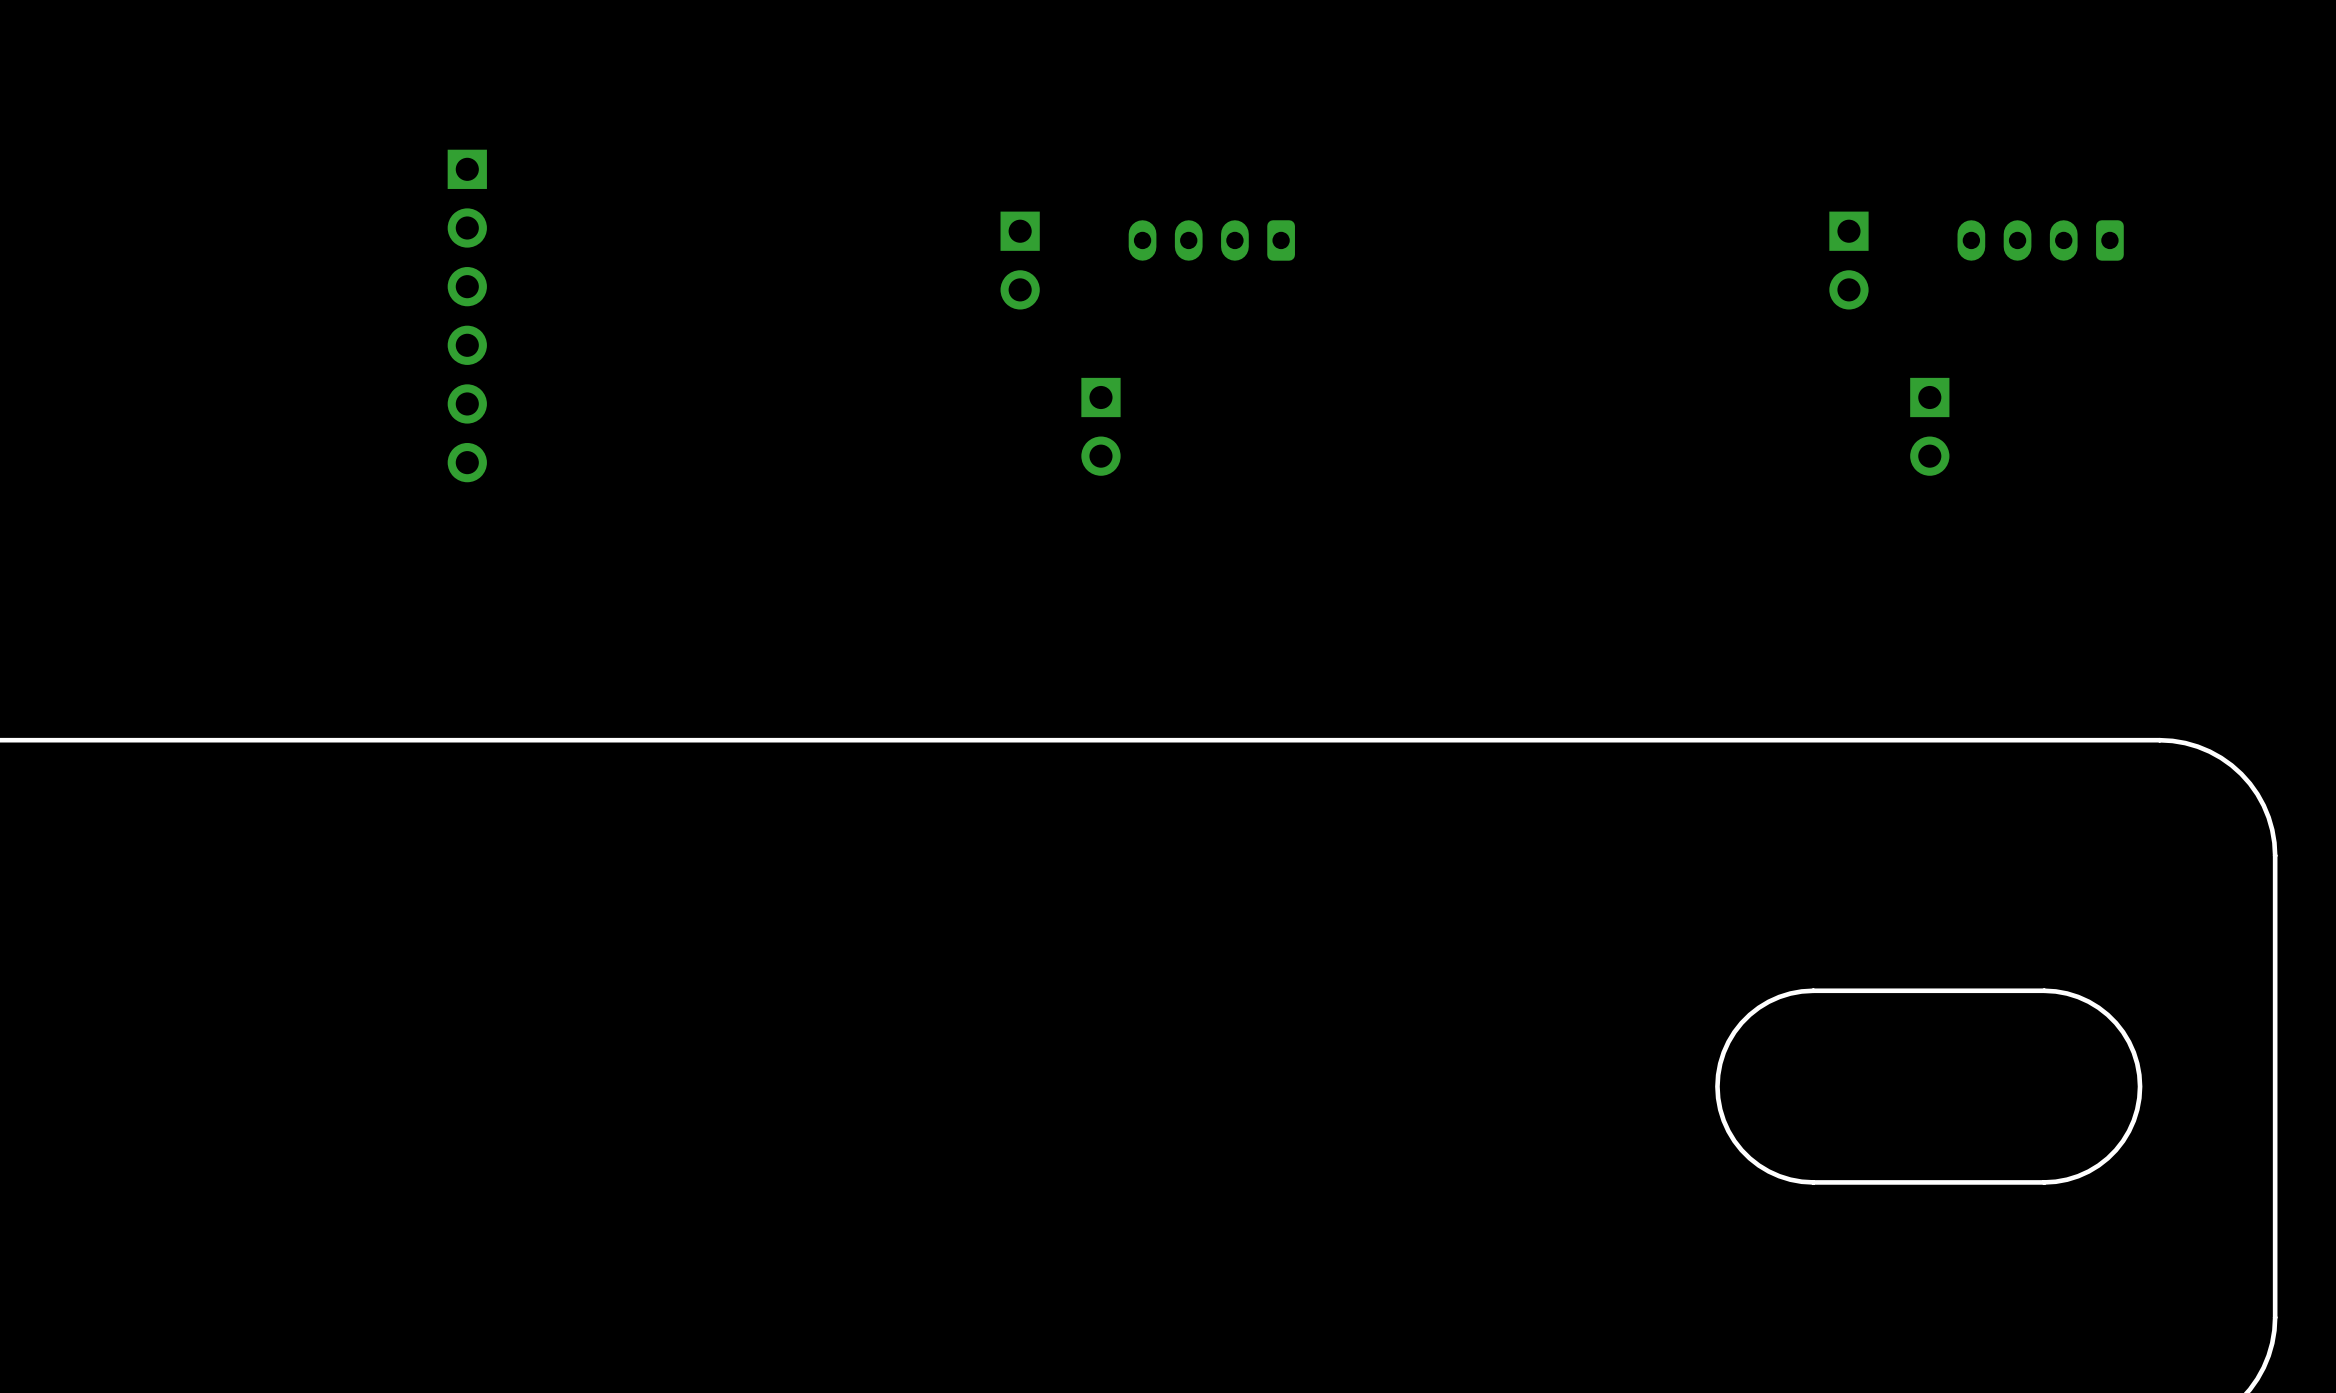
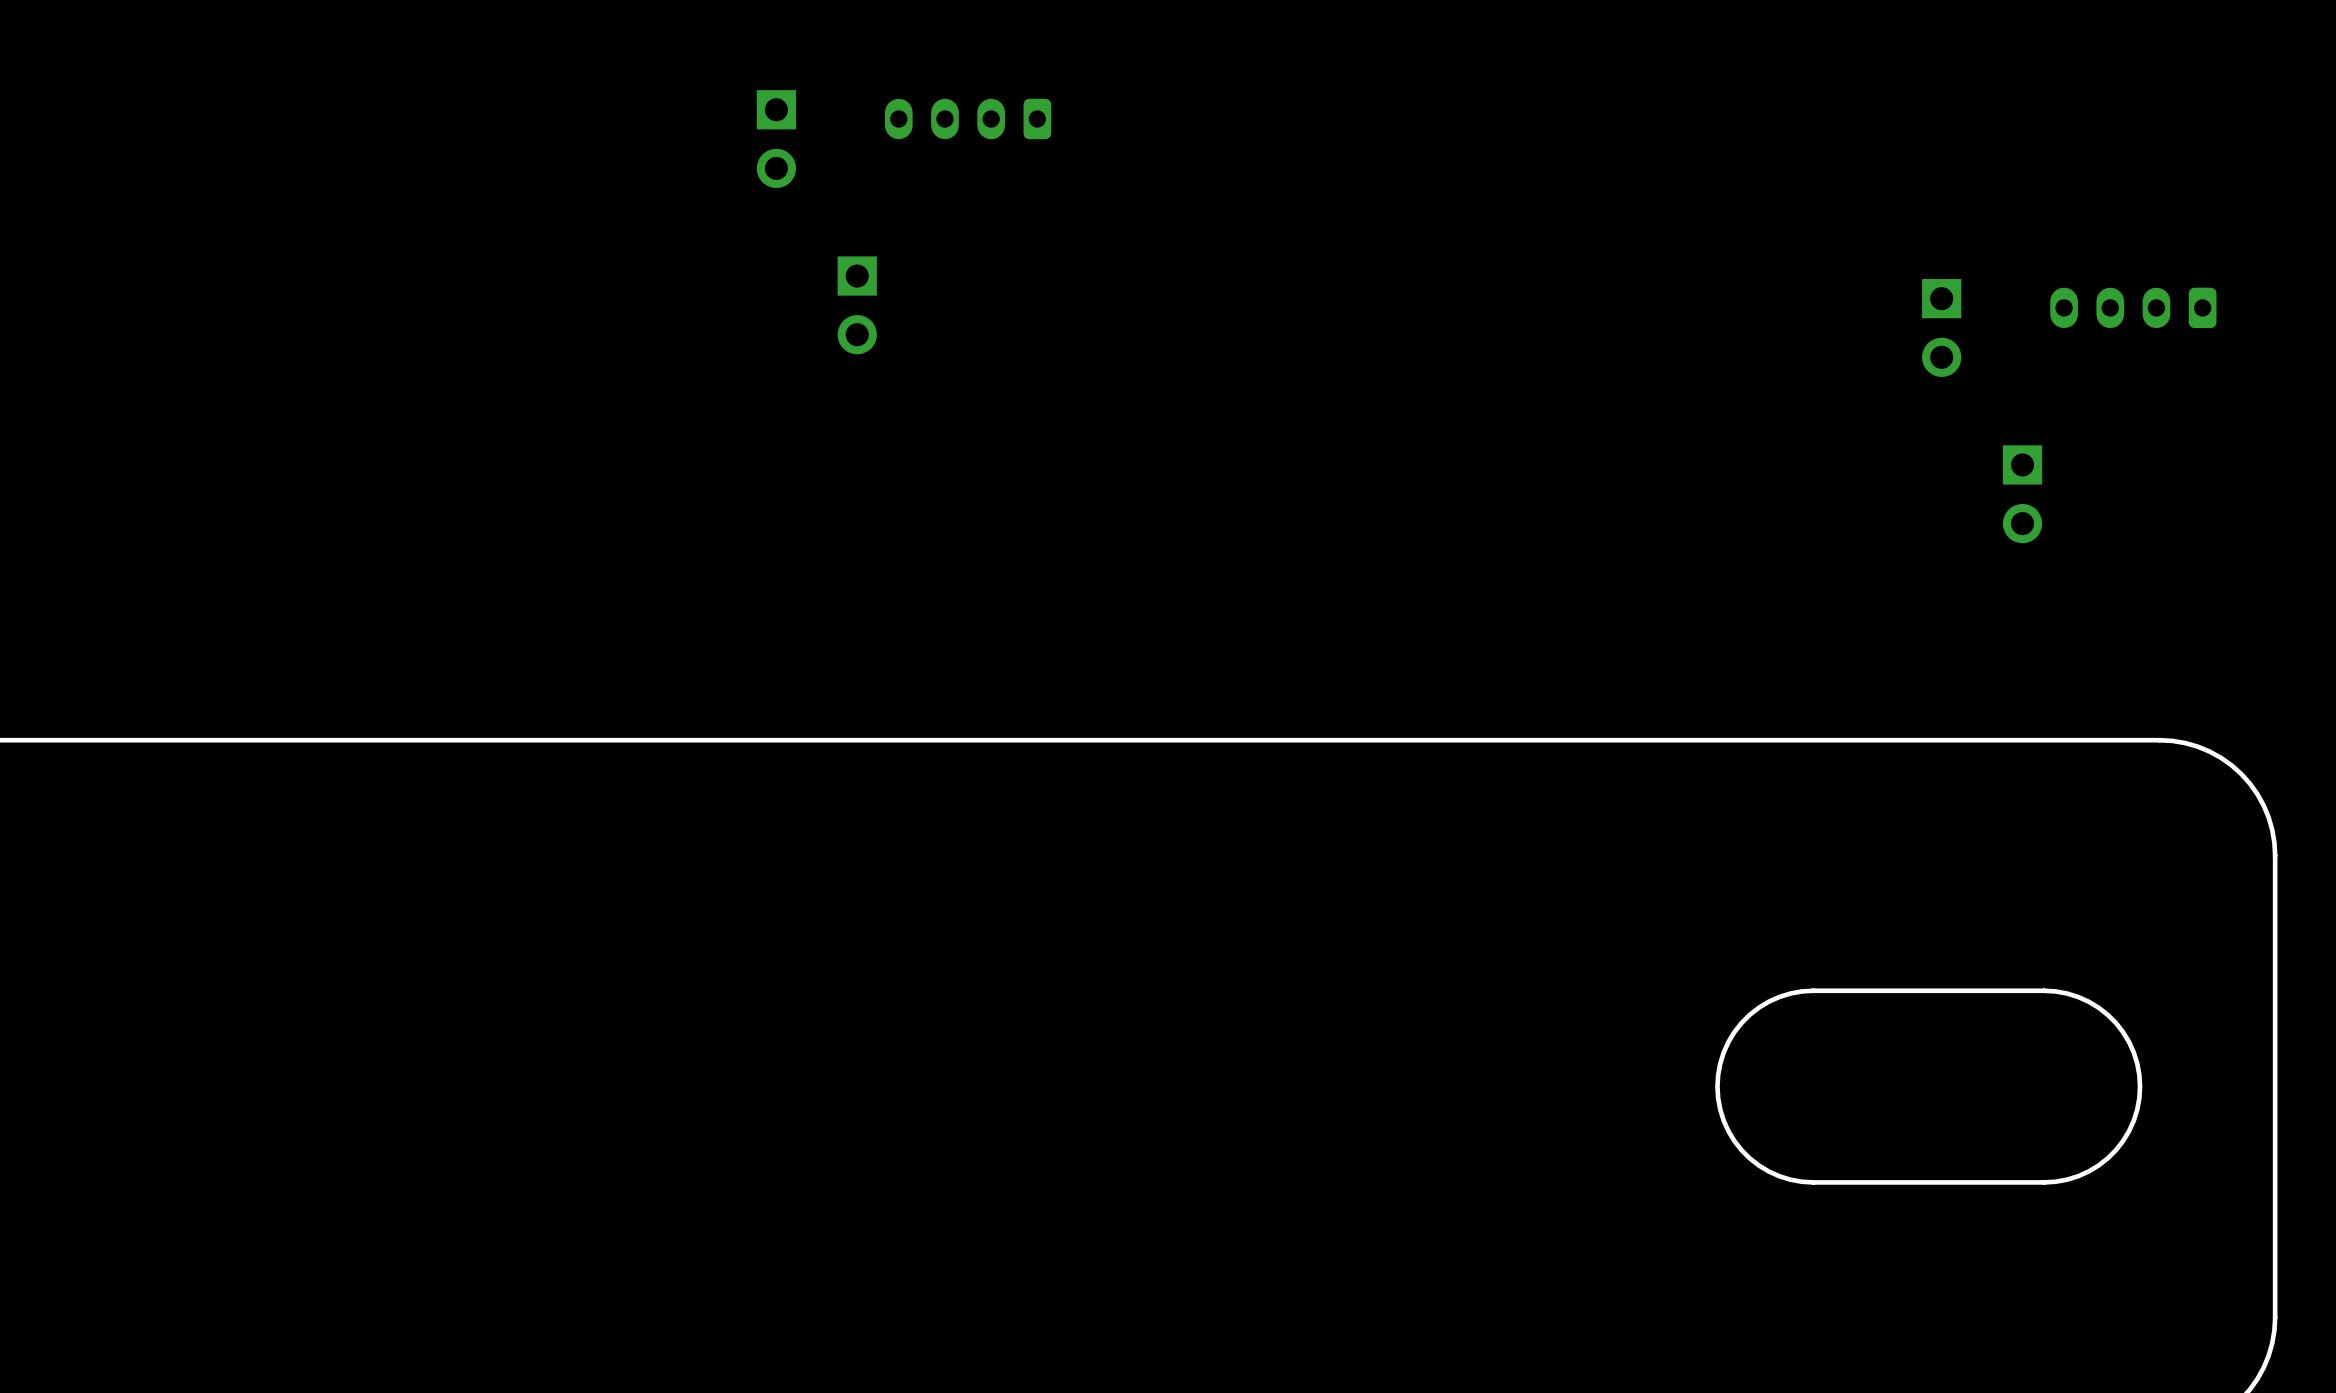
part: none -> (776, 139)
part position: (1211, 240) -> (968, 118)
part position: (2040, 240) -> (2133, 307)
part: (1020, 260) -> none
part: (1848, 260) -> none
part: none -> (857, 305)
part: (467, 315) -> none
part: none -> (1941, 327)
part: (1100, 426) -> none
part: (1929, 426) -> none
part: none -> (2022, 494)

